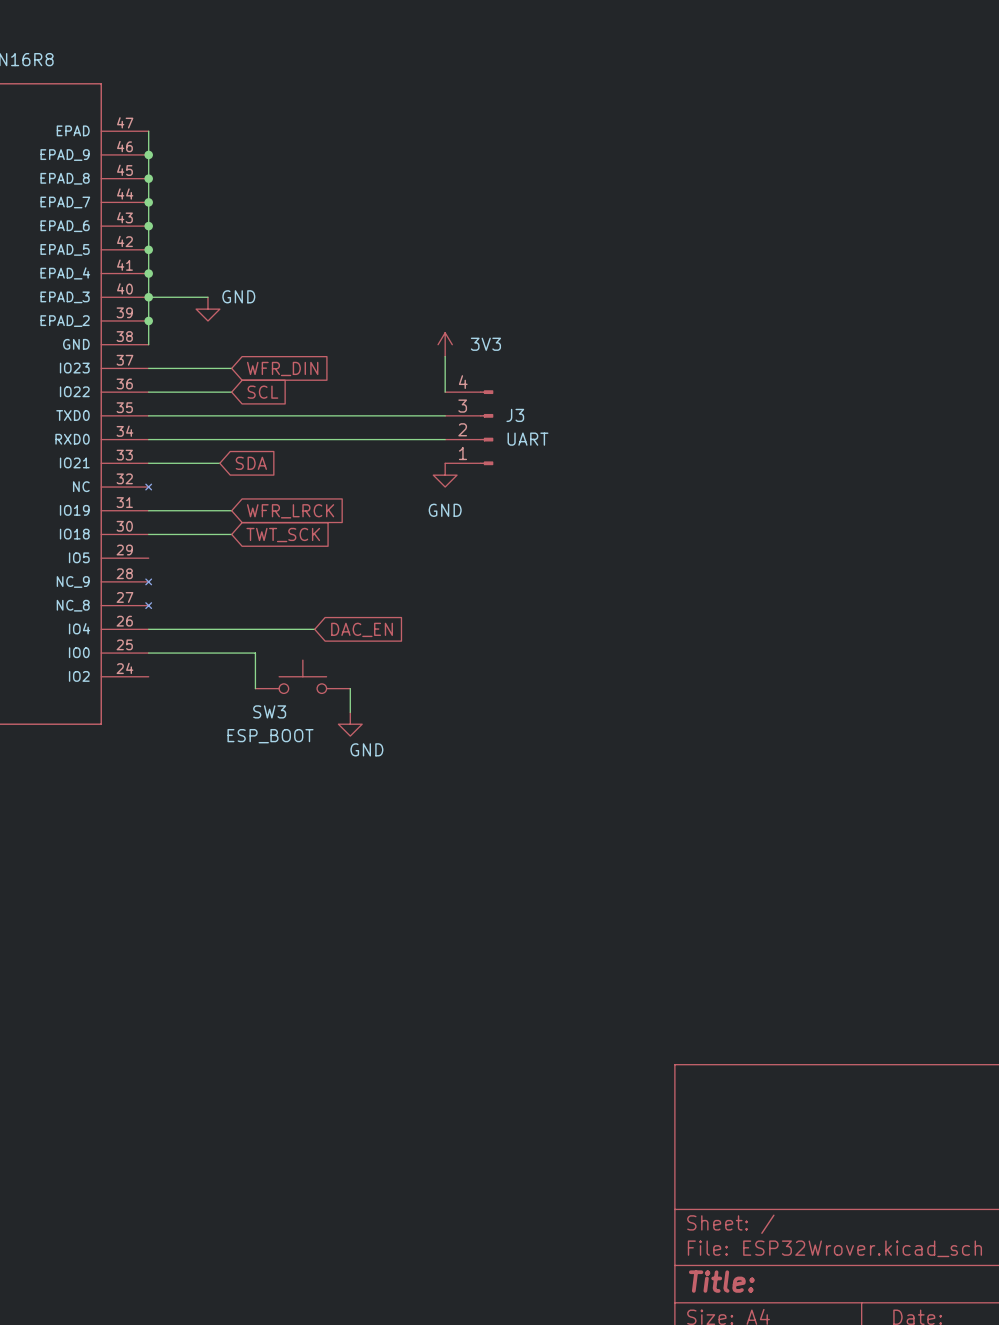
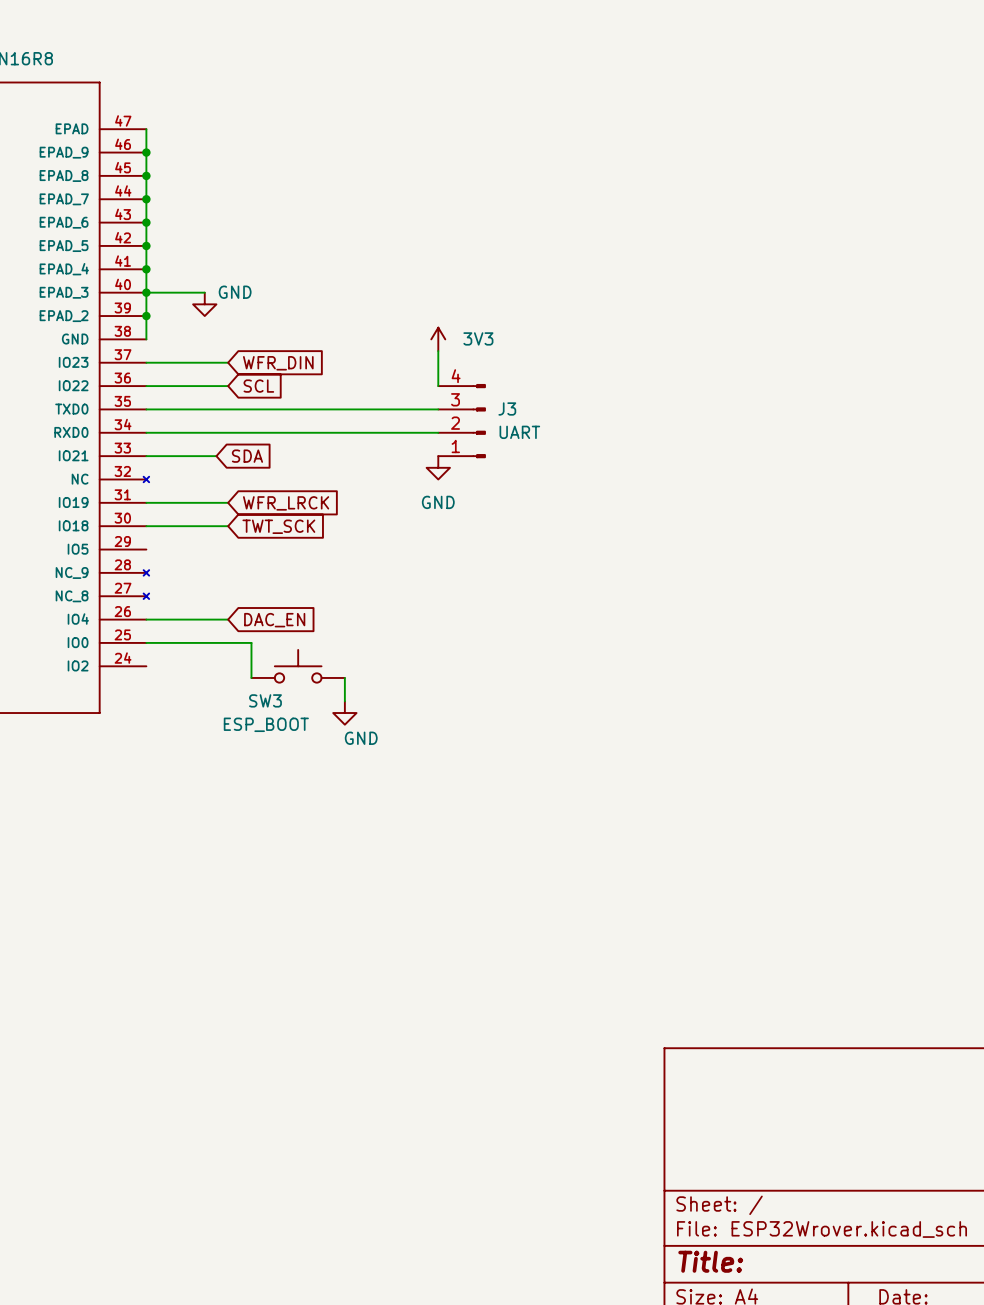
wire: (231, 629) (314, 629) -> none
global label position: DAC_EN (362, 629) -> DAC_EN (274, 620)

